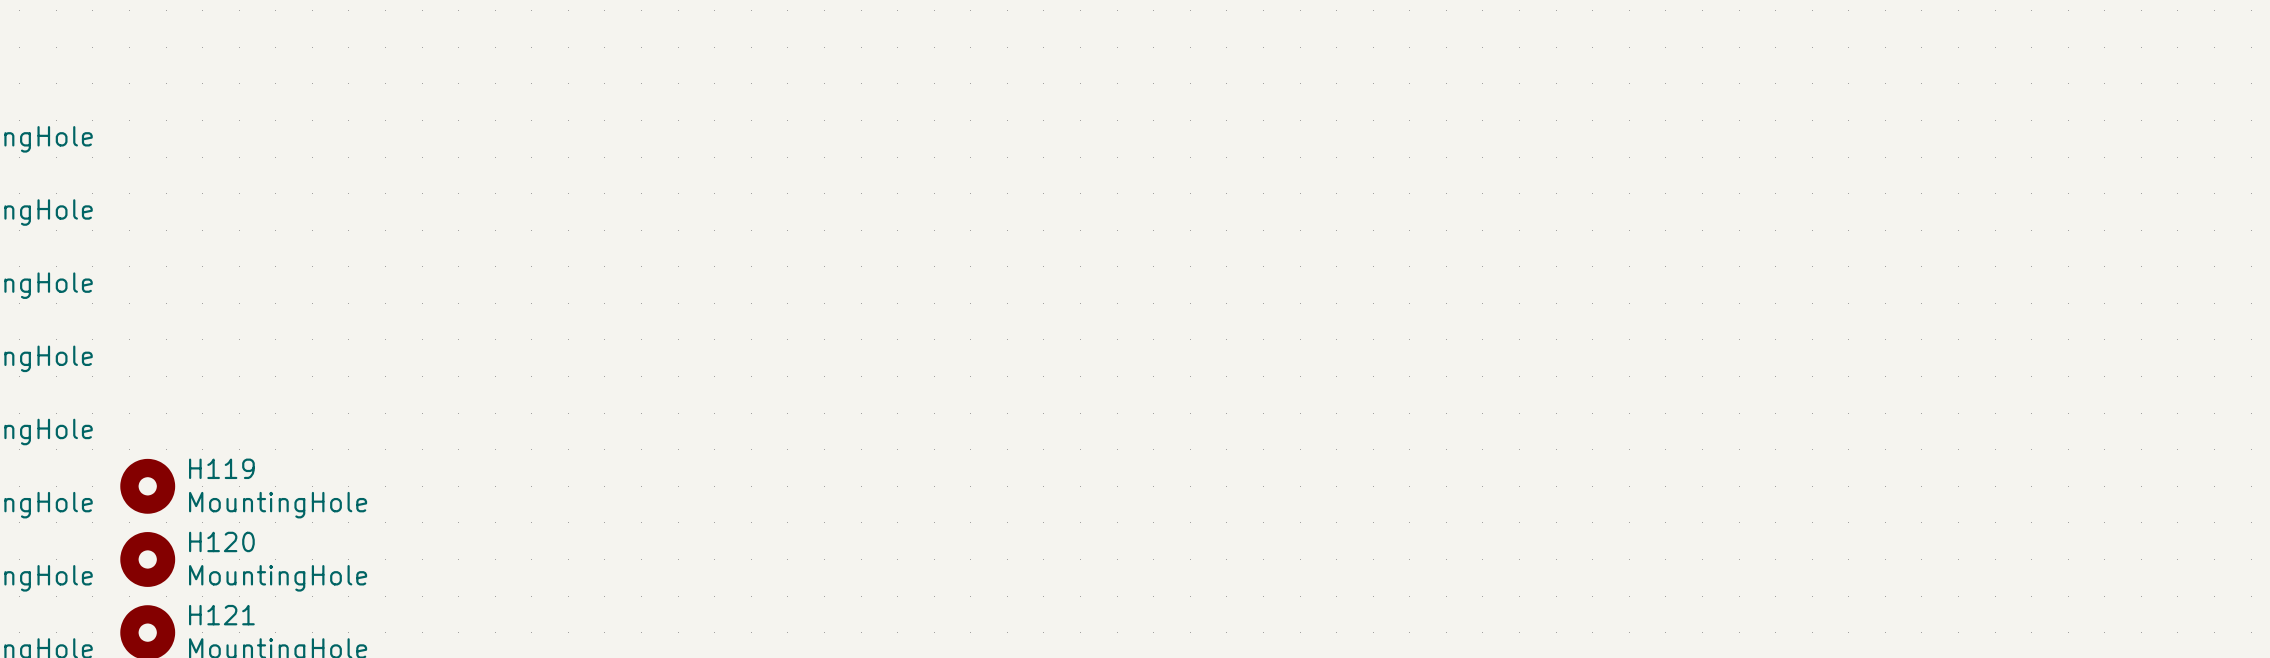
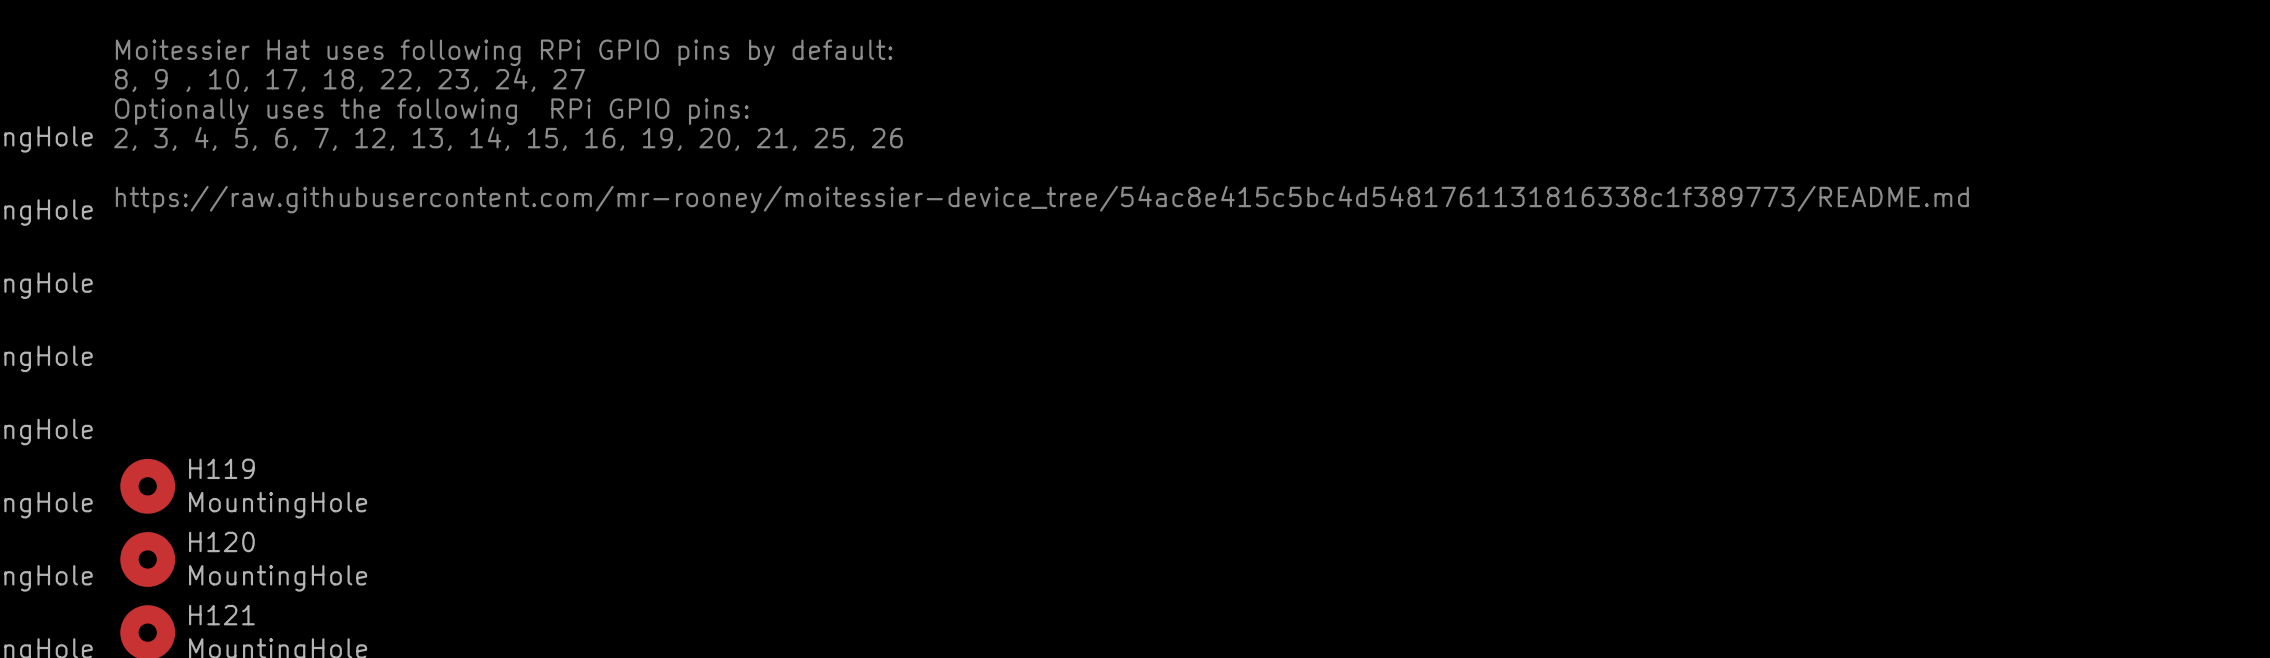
text: none -> Moitessier Hat uses following RPi GPIO pins by default: (504, 52)
text: none -> 8, 9 , 10, 17, 18, 22, 23, 24, 27 (349, 80)
text: none -> Optionally uses the following RPi GPIO pins: (431, 111)
text: none -> 2, 3, 4, 5, 6, 7, 12, 13, 14, 15, 16, 19, 20, 21, 25, 26 (508, 138)
text: none -> https://raw.githubusercontent.com/mr-rooney/moitessier-device_tree/54ac8e415c5bc4d5481761131816338c1f389773/README.md (1042, 199)

